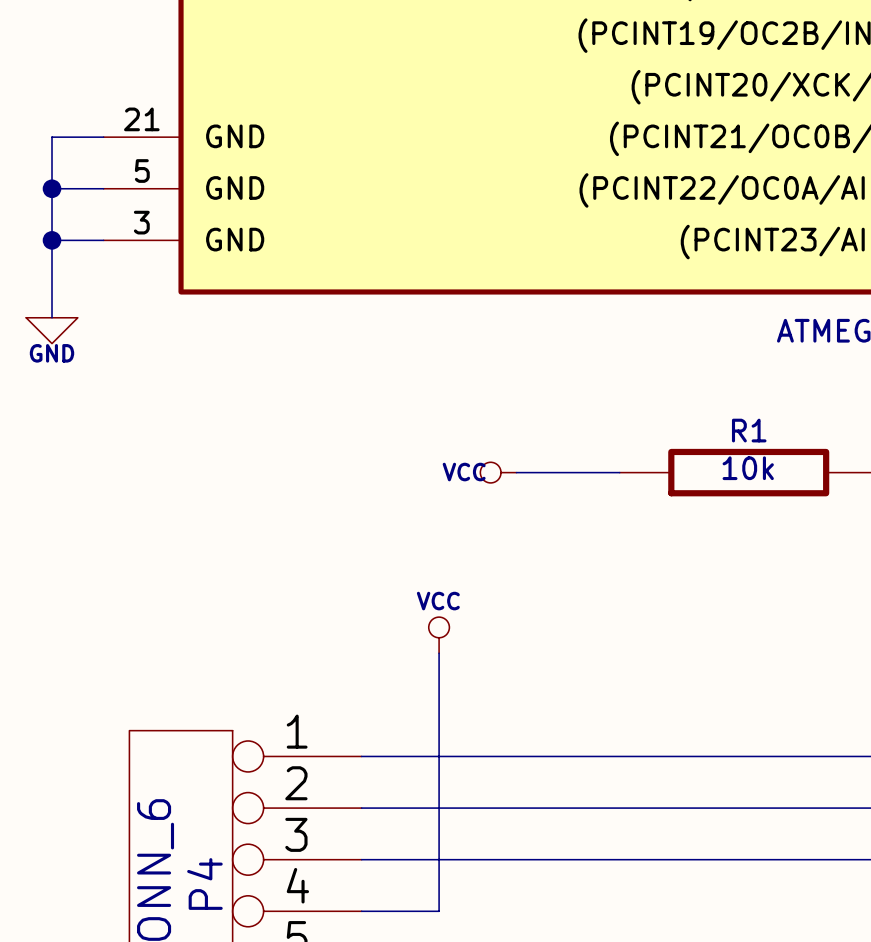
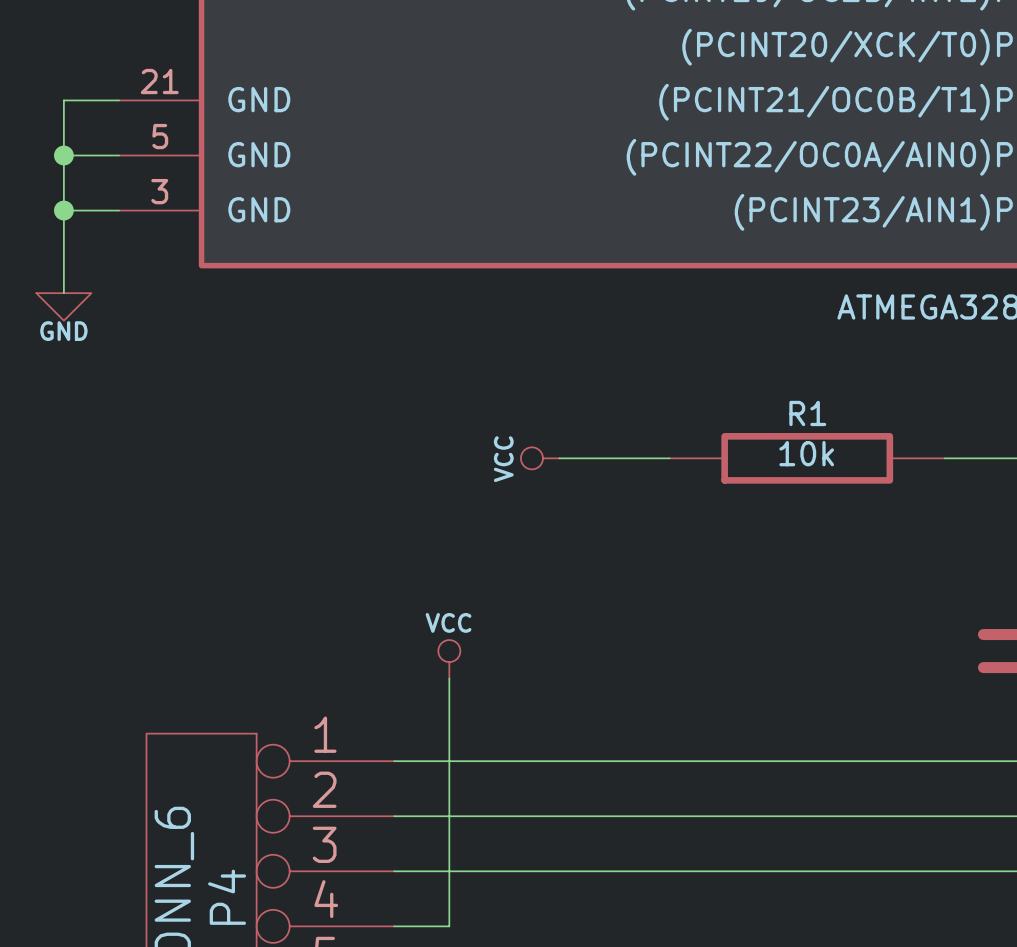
power symbol text rotation: 0° (464, 472) -> 90° counterclockwise (503, 459)
power symbol position: VCC (439, 635) -> VCC (449, 659)
wire: (439, 653) (439, 911) (413, 911) -> (449, 678) (449, 926)

